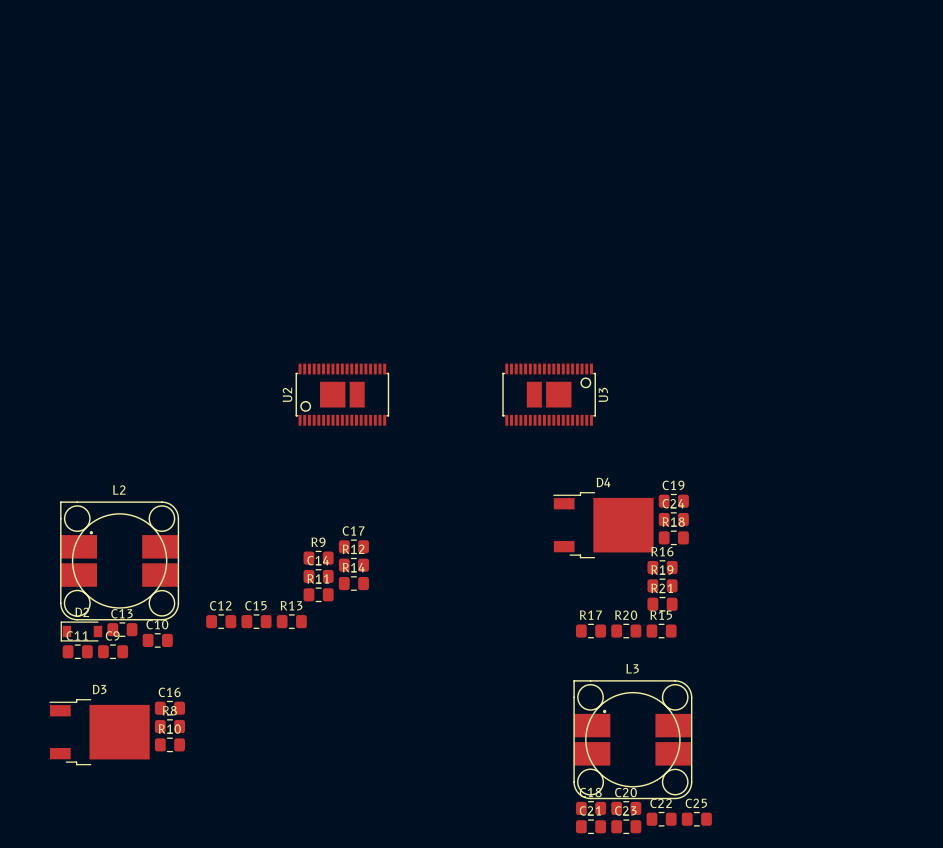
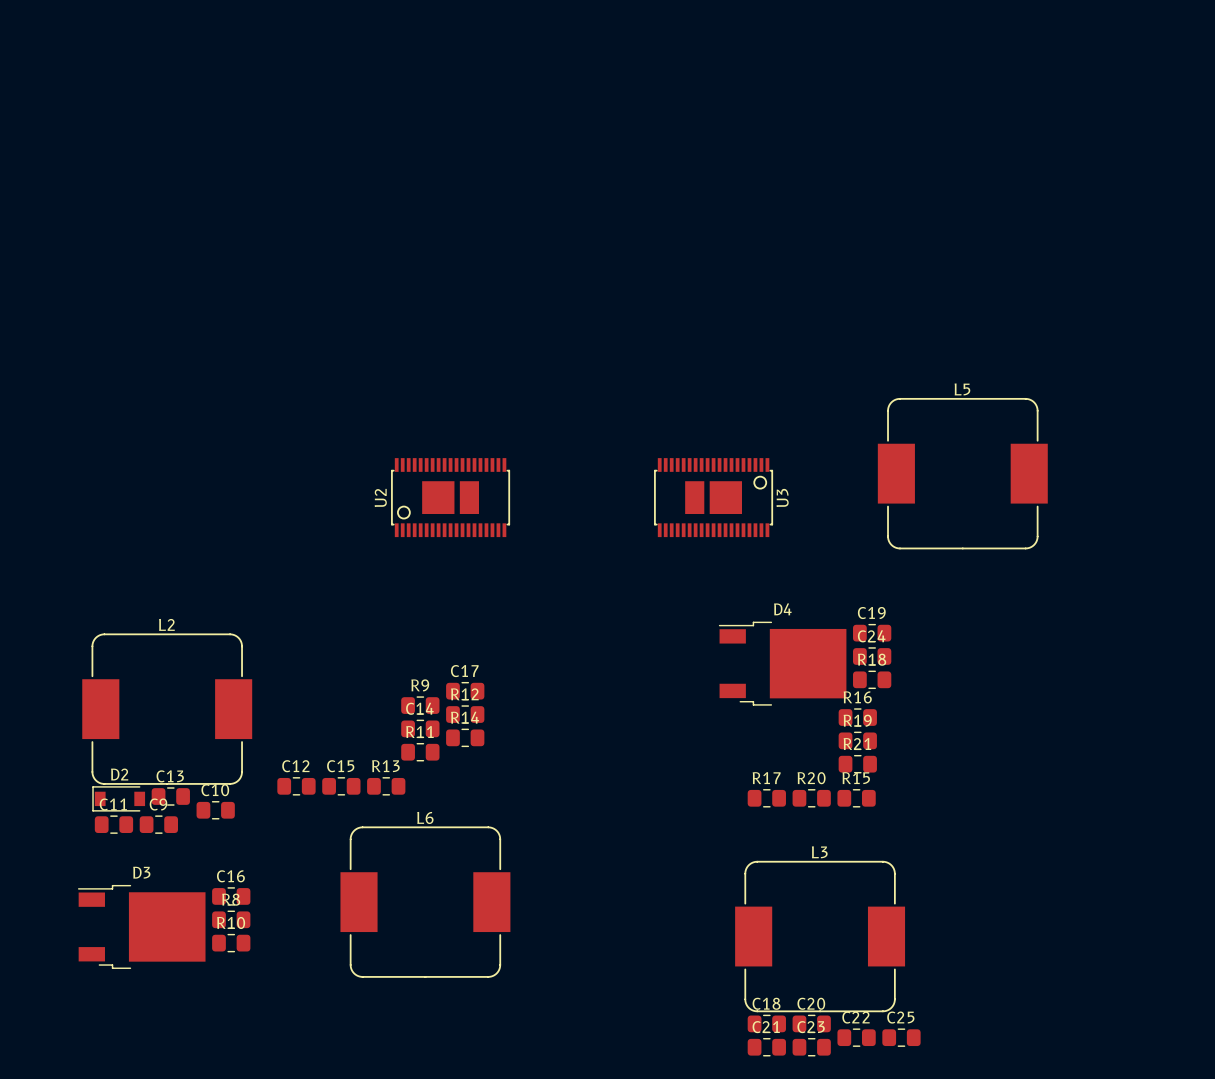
L5: none -> (962, 473)
L2 footprint: [60, 501, 180, 621] -> [82, 633, 253, 785]
L3 footprint: [573, 680, 693, 800] -> [735, 860, 906, 1013]
L6: none -> (425, 902)

